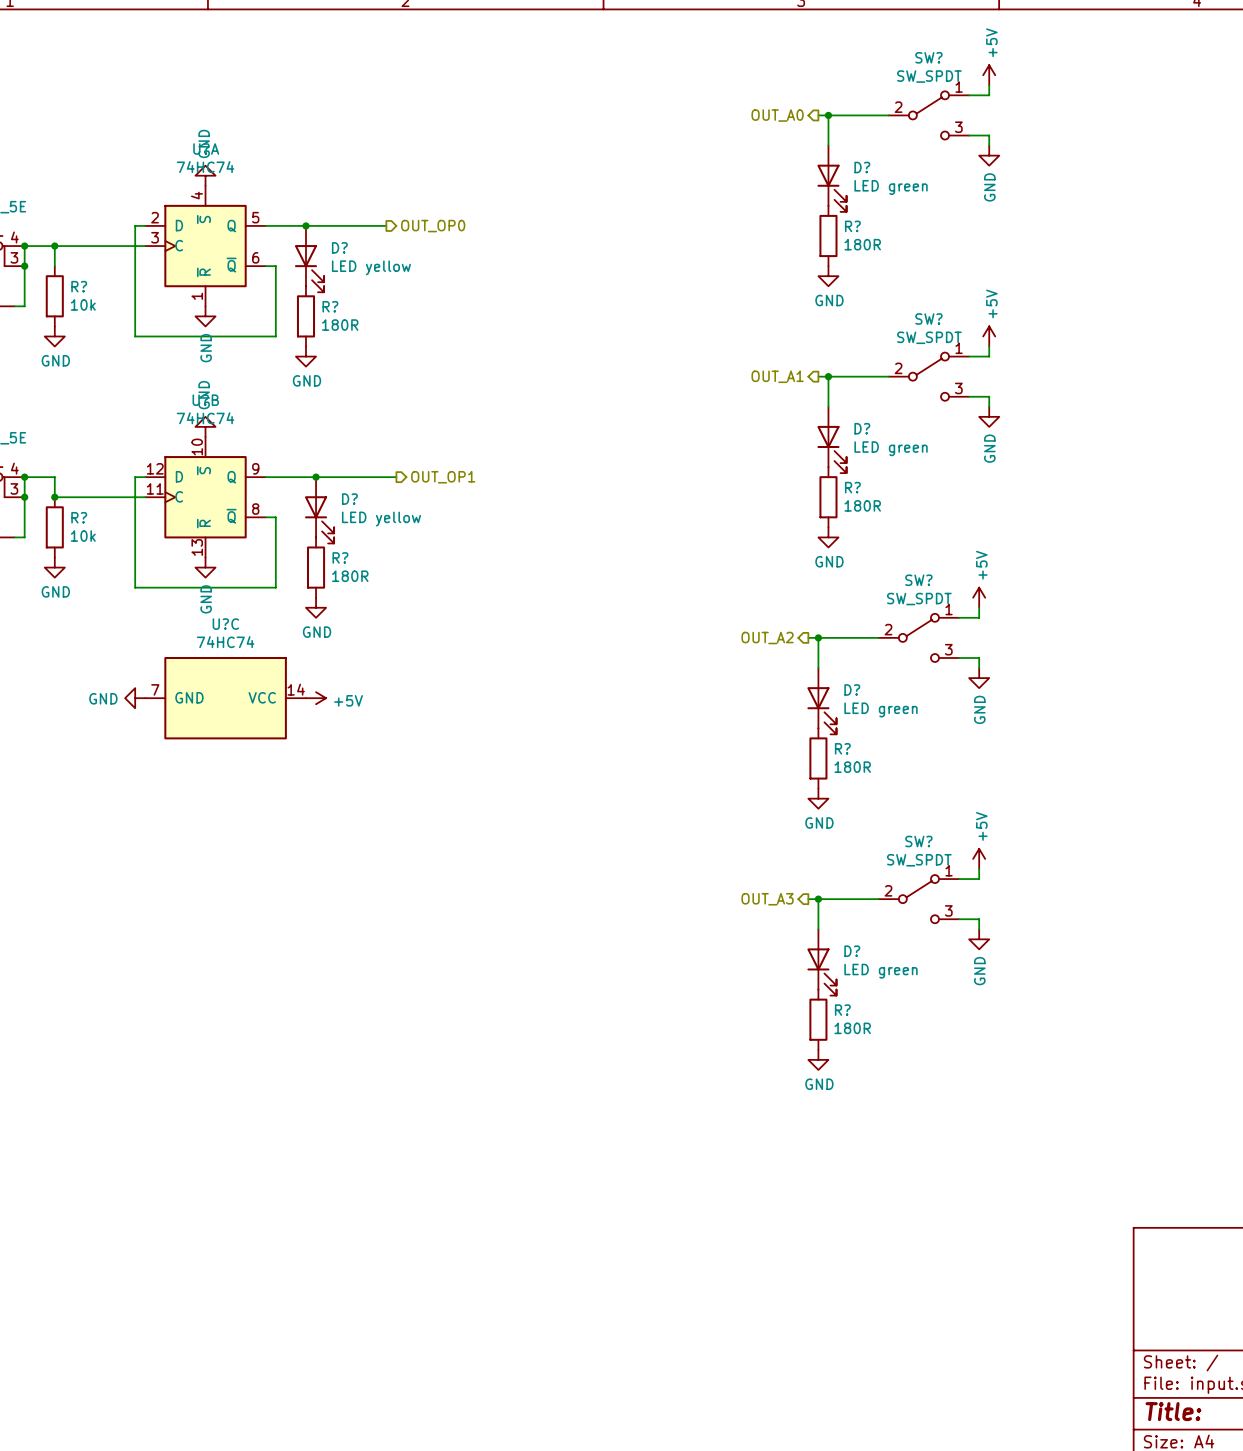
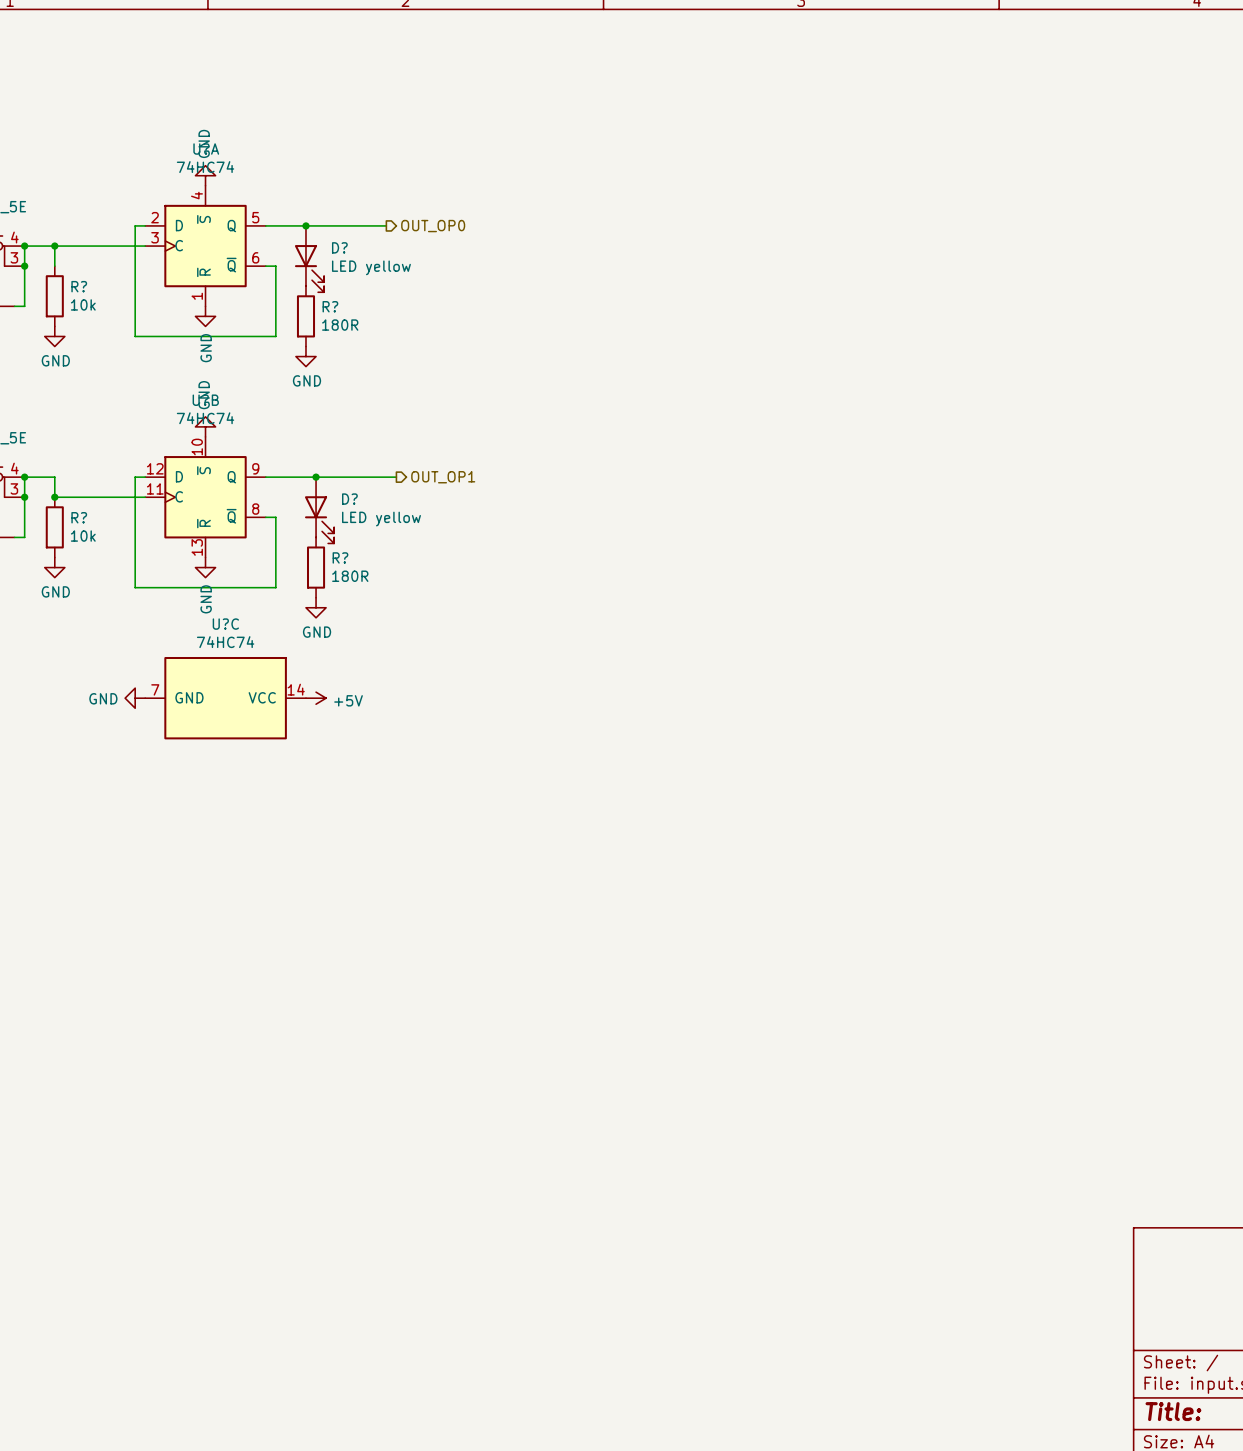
power symbol: +5V (989, 75) -> none
wire: (989, 85) (989, 95) (969, 95) -> none
hierarchical label: OUT_A0 (777, 115) -> none
wire: (818, 115) (888, 115) -> none
wire: (828, 115) (828, 145) -> none
junction: (828, 115) -> none
SW?: SW_SPDT (928, 115) -> none
wire: (969, 135) (989, 135) (989, 145) -> none
power symbol: GND (989, 155) -> none
D?: LED green (831, 178) -> none
R?: 180R (828, 236) -> none
power symbol: GND (828, 276) -> none
power symbol: +5V (989, 336) -> none
wire: (989, 346) (989, 356) (969, 356) -> none
hierarchical label: OUT_A1 (777, 376) -> none
wire: (818, 376) (888, 376) -> none
wire: (828, 376) (828, 406) -> none
junction: (828, 376) -> none
SW?: SW_SPDT (928, 376) -> none
wire: (969, 396) (989, 396) (989, 406) -> none
power symbol: GND (989, 416) -> none
D?: LED green (831, 439) -> none
R?: 180R (828, 497) -> none
power symbol: GND (828, 537) -> none
power symbol: +5V (979, 597) -> none
wire: (979, 607) (979, 617) (959, 617) -> none
wire: (808, 637) (878, 637) -> none
wire: (818, 637) (818, 668) -> none
junction: (818, 637) -> none
SW?: SW_SPDT (918, 637) -> none
hierarchical label: OUT_A2 (767, 638) -> none
wire: (959, 658) (979, 658) (979, 668) -> none
power symbol: GND (979, 678) -> none
D?: LED green (821, 701) -> none
R?: 180R (818, 758) -> none
power symbol: GND (818, 798) -> none
power symbol: +5V (979, 858) -> none
wire: (979, 869) (979, 879) (959, 879) -> none
hierarchical label: OUT_A3 (767, 899) -> none
wire: (808, 899) (878, 899) -> none
wire: (818, 899) (818, 929) -> none
junction: (818, 899) -> none
SW?: SW_SPDT (918, 899) -> none
wire: (959, 919) (979, 919) (979, 929) -> none
power symbol: GND (979, 939) -> none
D?: LED green (821, 962) -> none
R?: 180R (818, 1019) -> none
power symbol: GND (818, 1059) -> none

